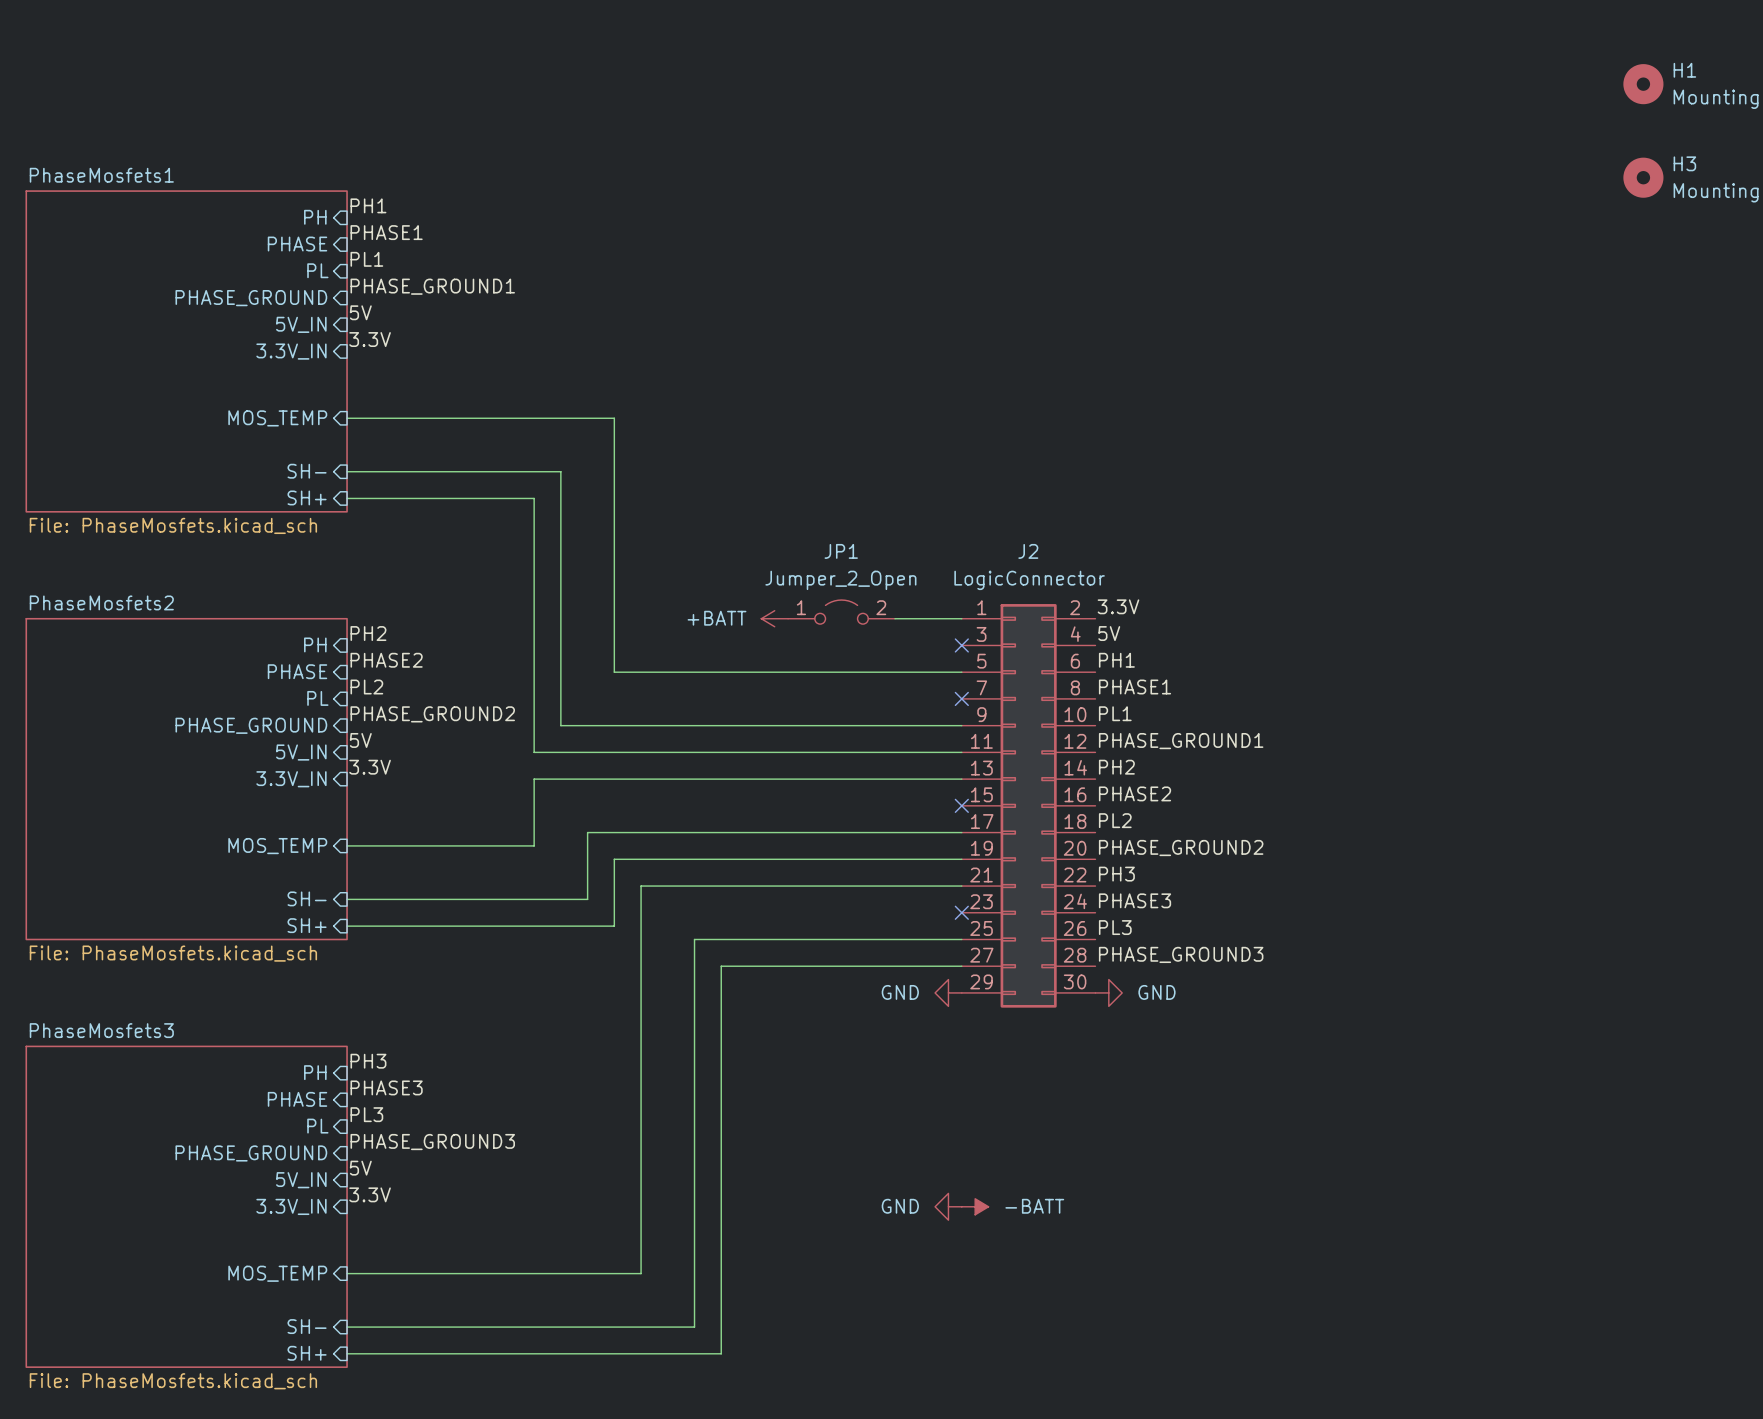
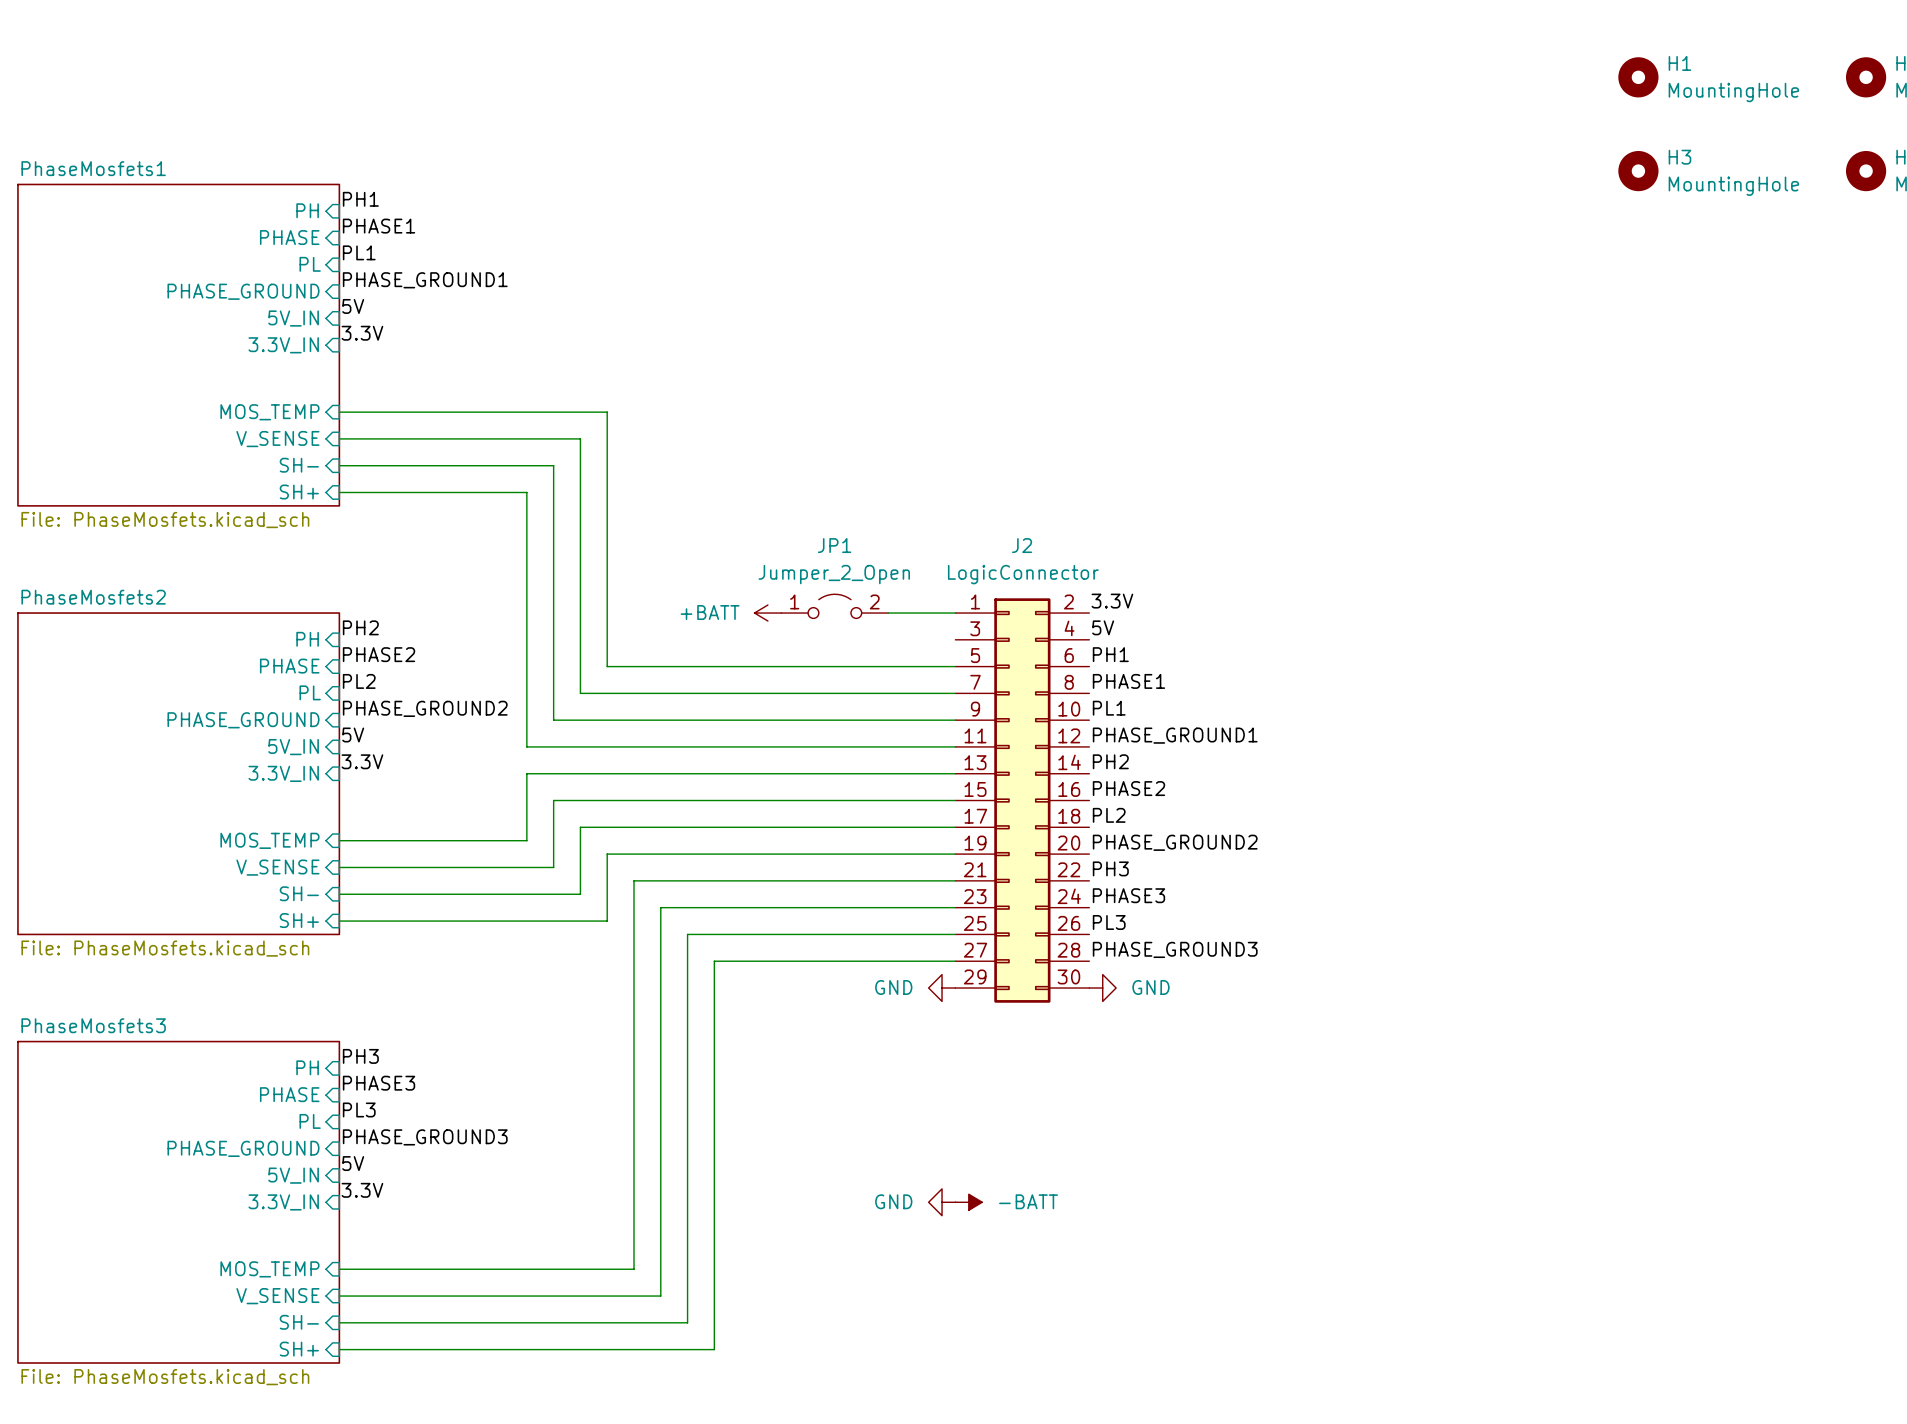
wire: none -> (339, 438) (580, 438) (580, 693) (955, 693)
sheet pin: none -> V_SENSE (277, 439)
no-connect mark: (961, 645) -> none
no-connect mark: (961, 698) -> none
wire: none -> (955, 800) (553, 800) (553, 867) (339, 867)
no-connect mark: (961, 805) -> none
sheet pin: none -> V_SENSE (277, 867)
wire: none -> (955, 907) (660, 907) (660, 1296) (339, 1296)
no-connect mark: (961, 912) -> none
sheet pin: none -> V_SENSE (277, 1296)

